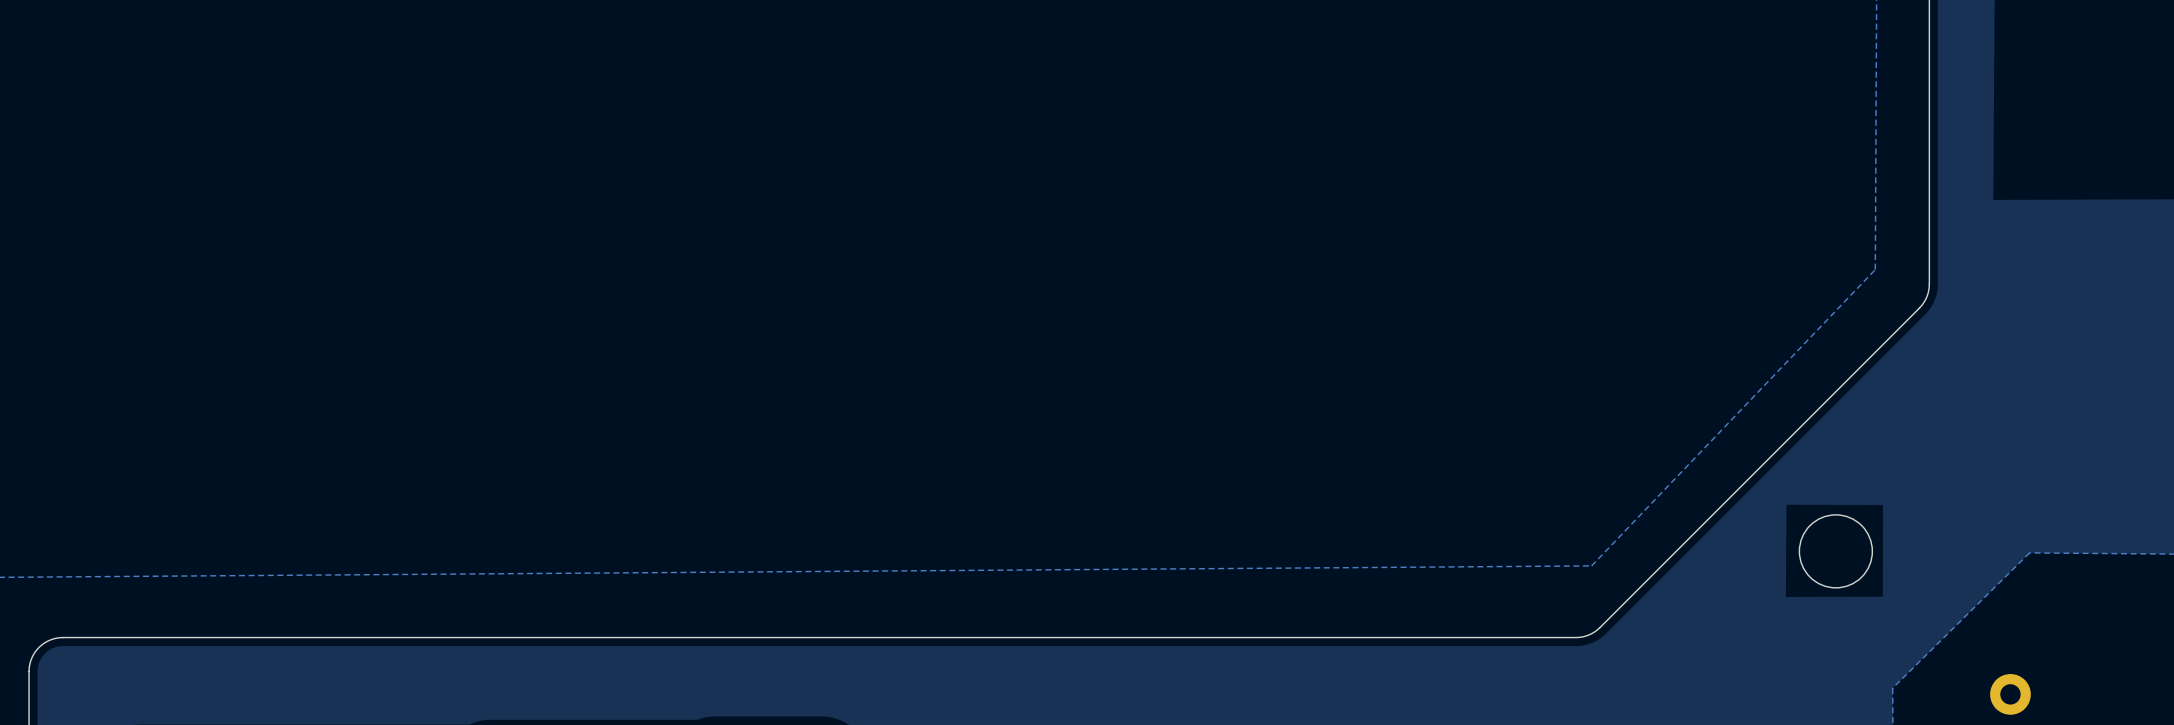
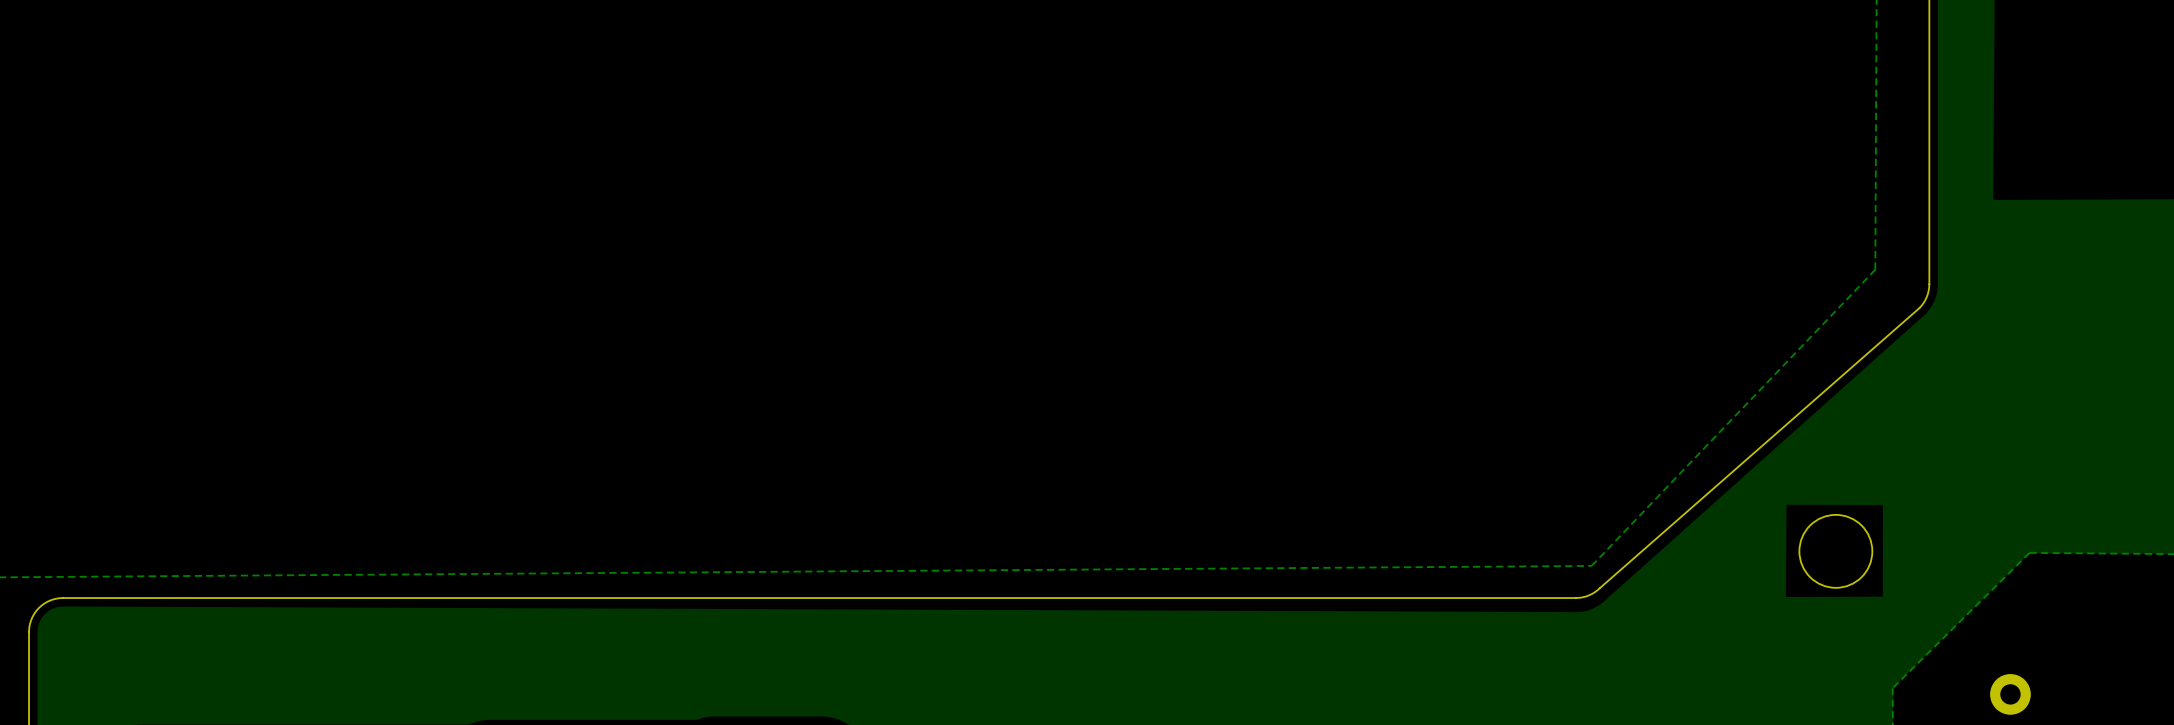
board edge: (1919, 308) (1599, 627) (1582, 636) (62, 637) (48, 640) (38, 647) (32, 656) (29, 671) -> (1919, 308) (1597, 590) (1582, 597) (62, 598) (44, 603) (32, 617) (29, 628) (29, 671)

